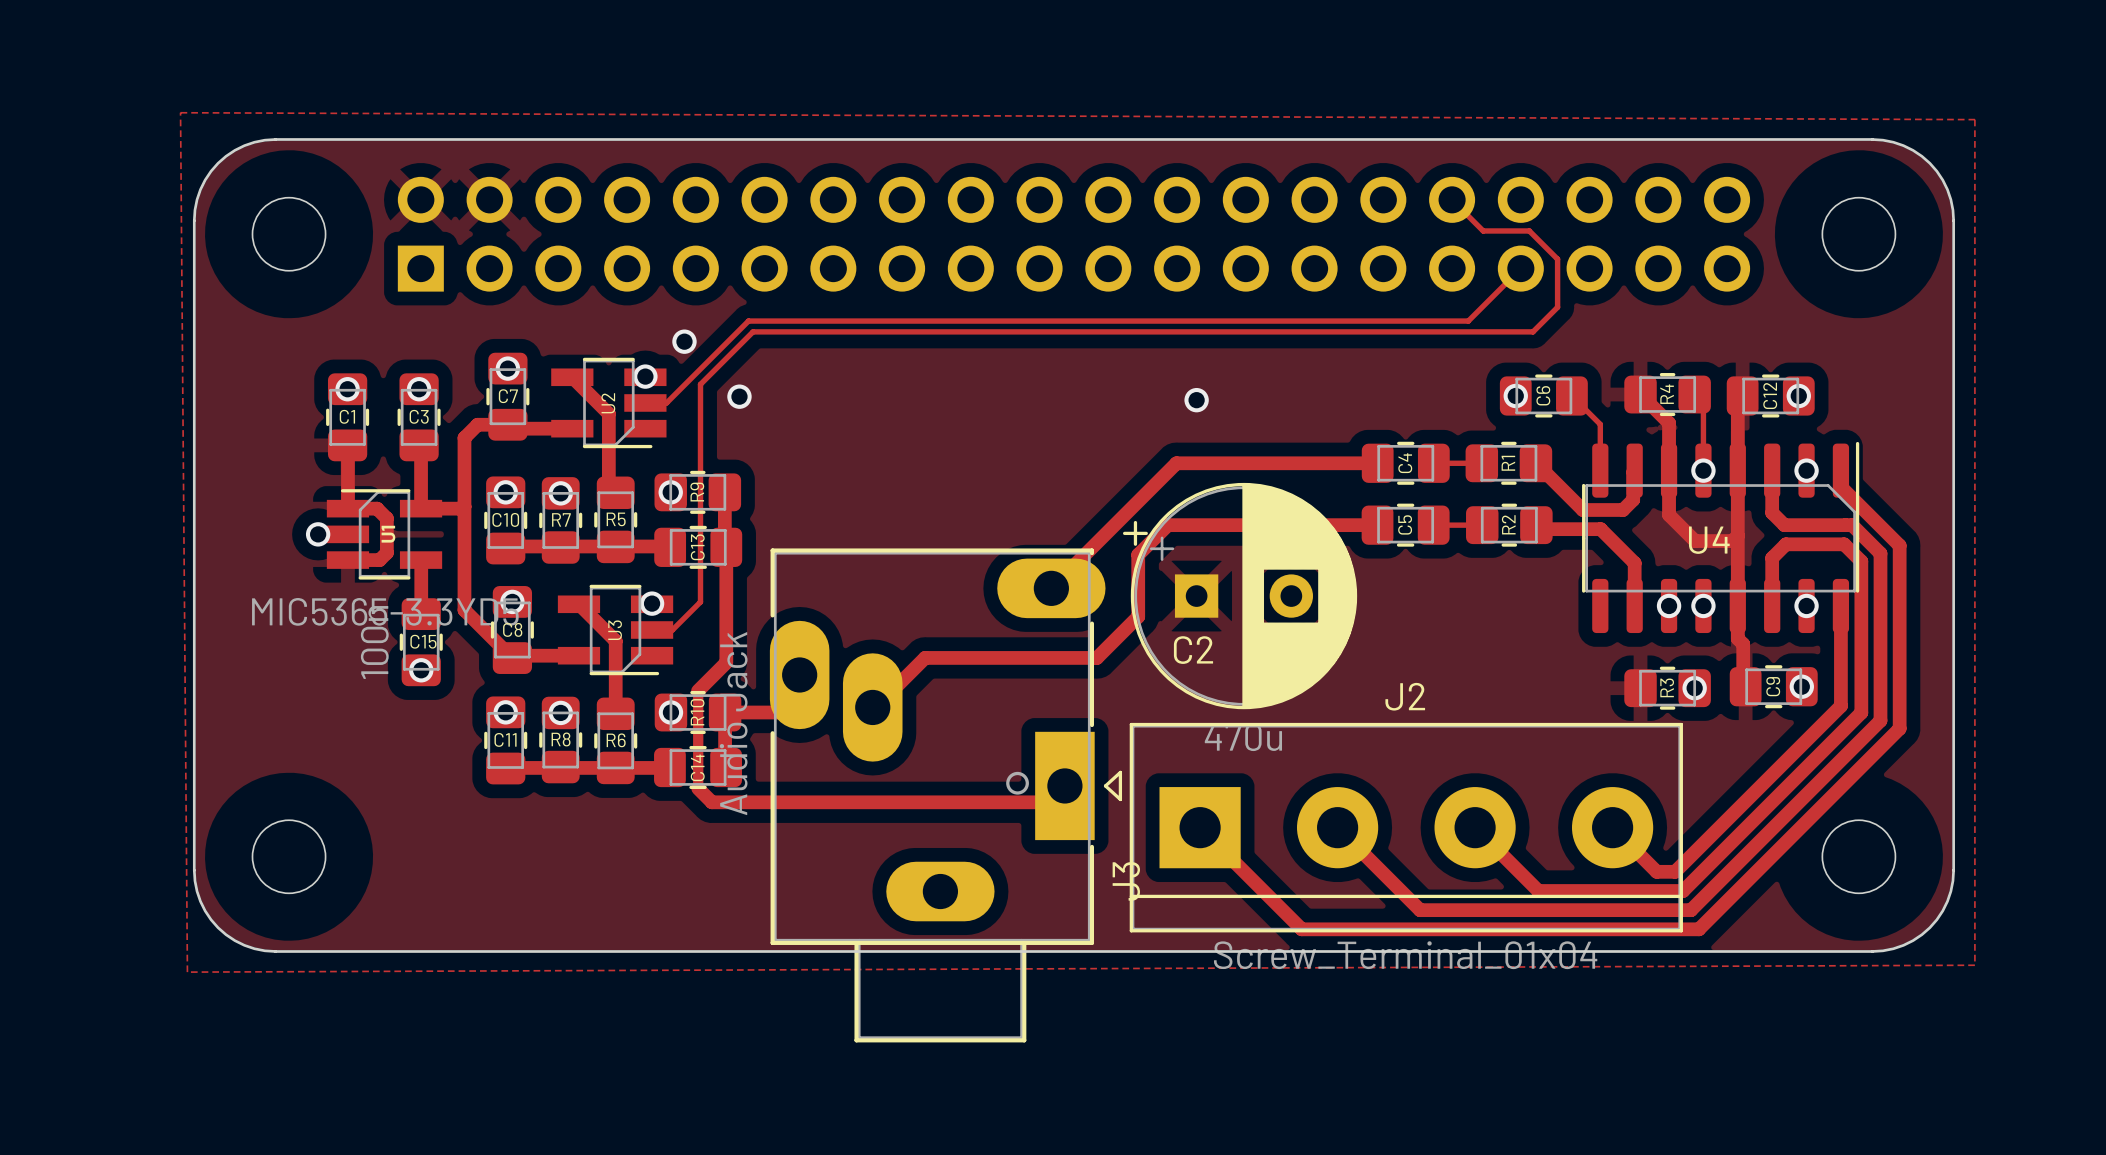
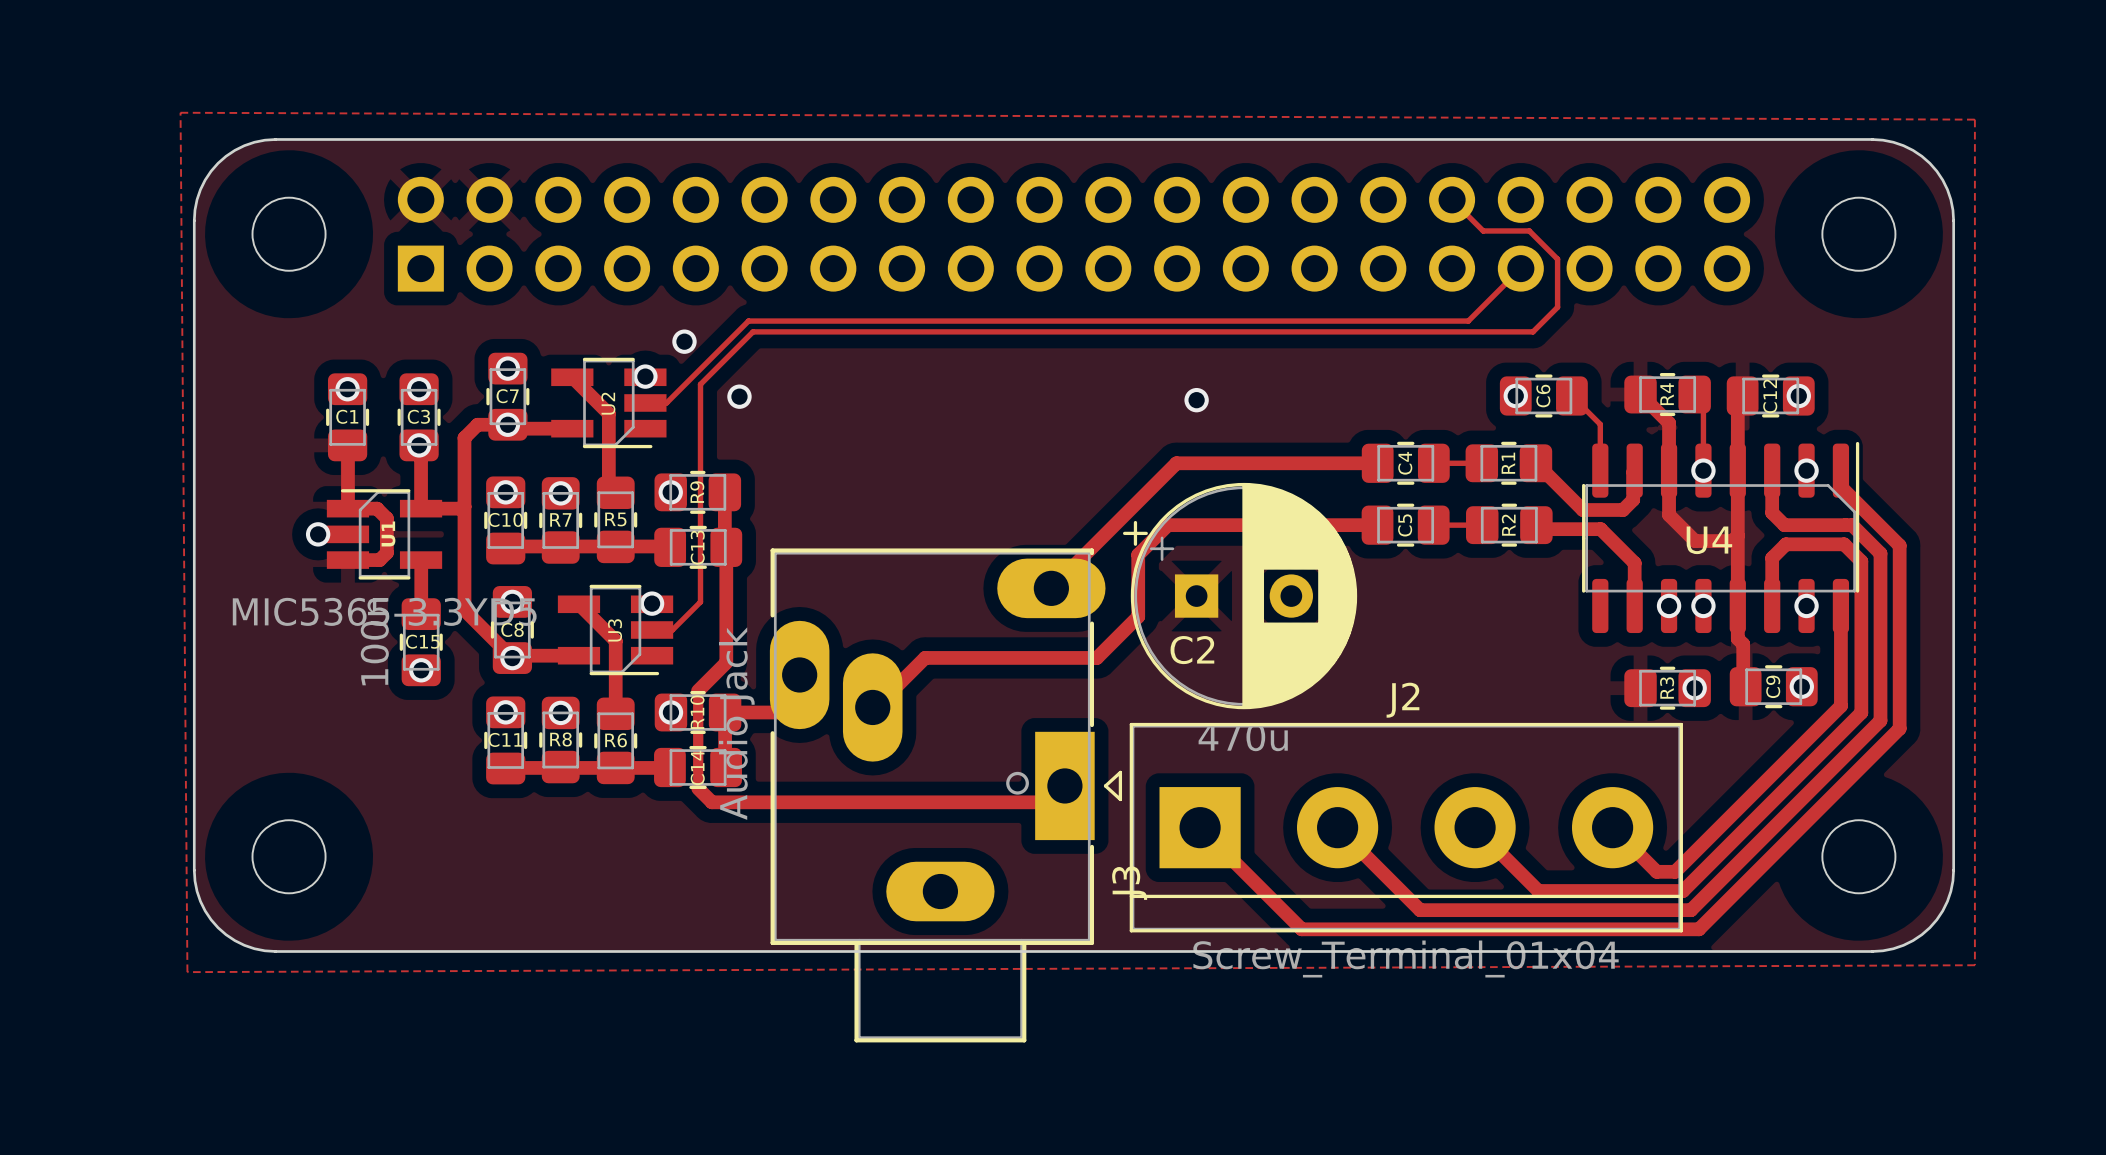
via: none -> (507, 424)
via: none -> (419, 445)
via: none -> (512, 658)

